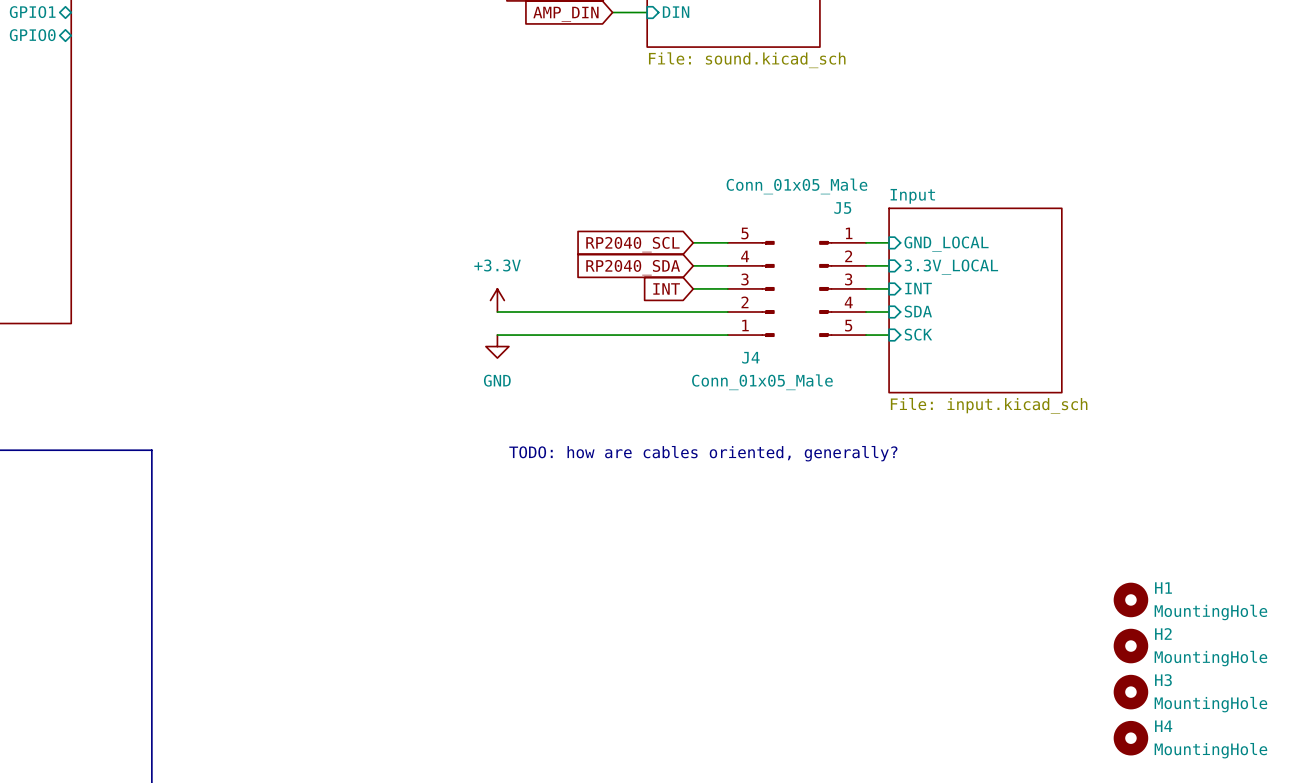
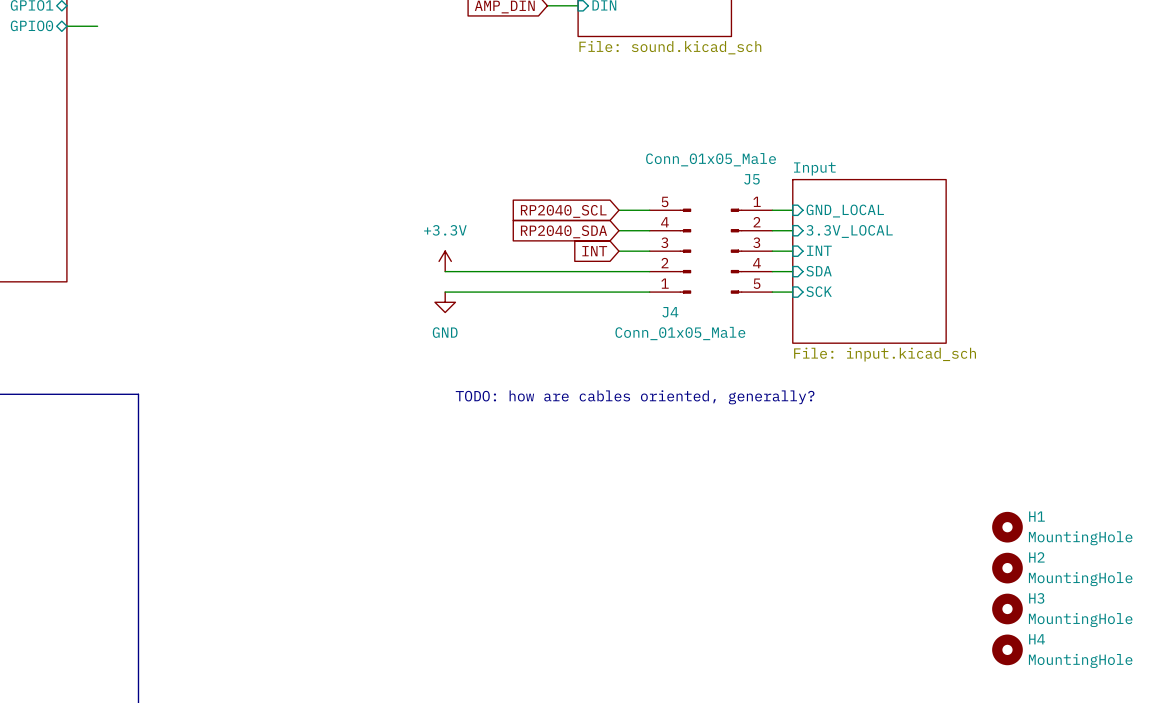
wire: none -> (66, 26) (97, 26)

